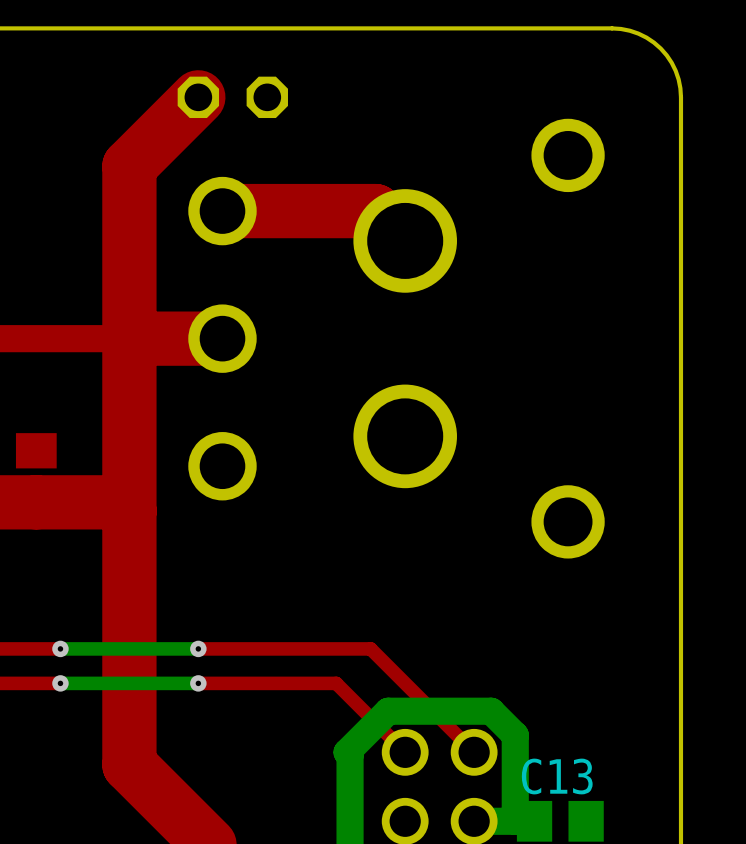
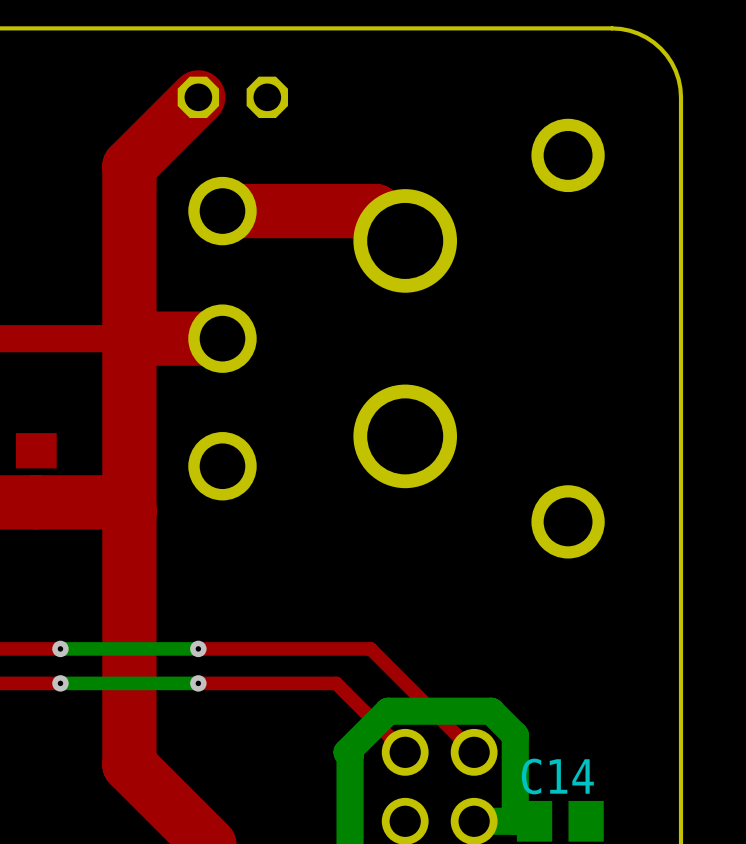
C13 name: C13 (557, 776) -> C14 (557, 776)

